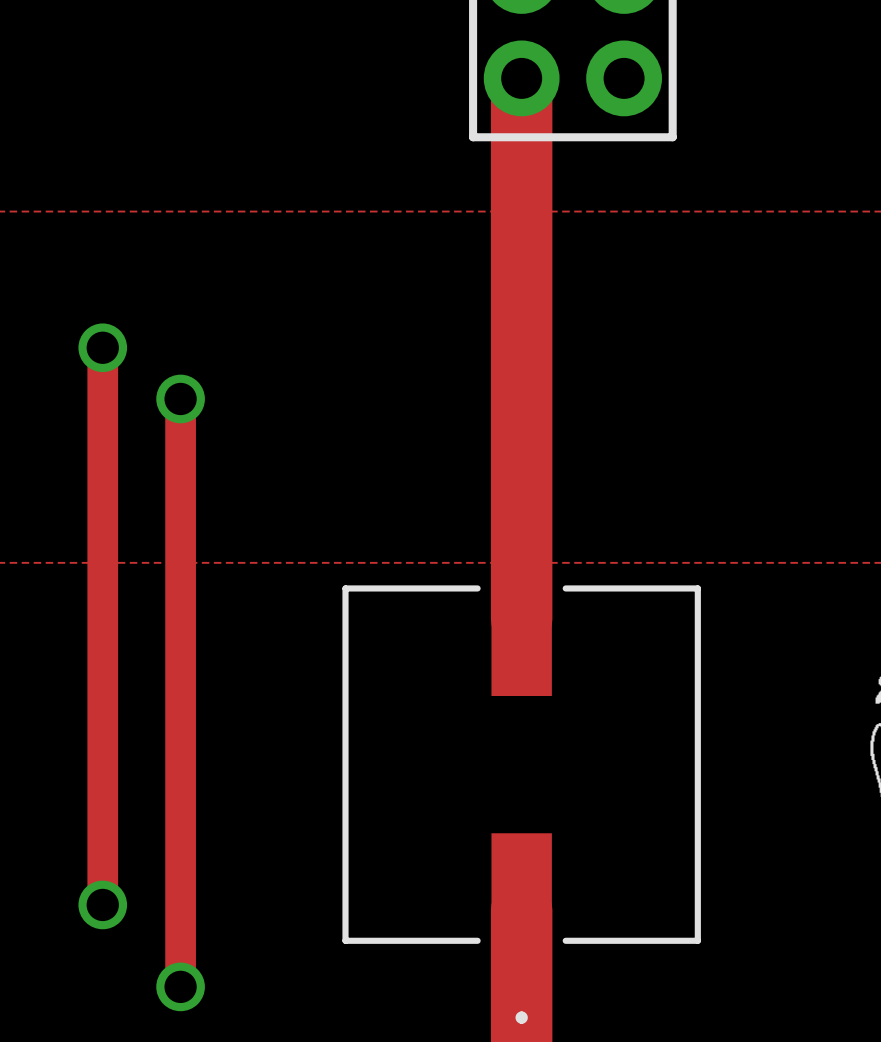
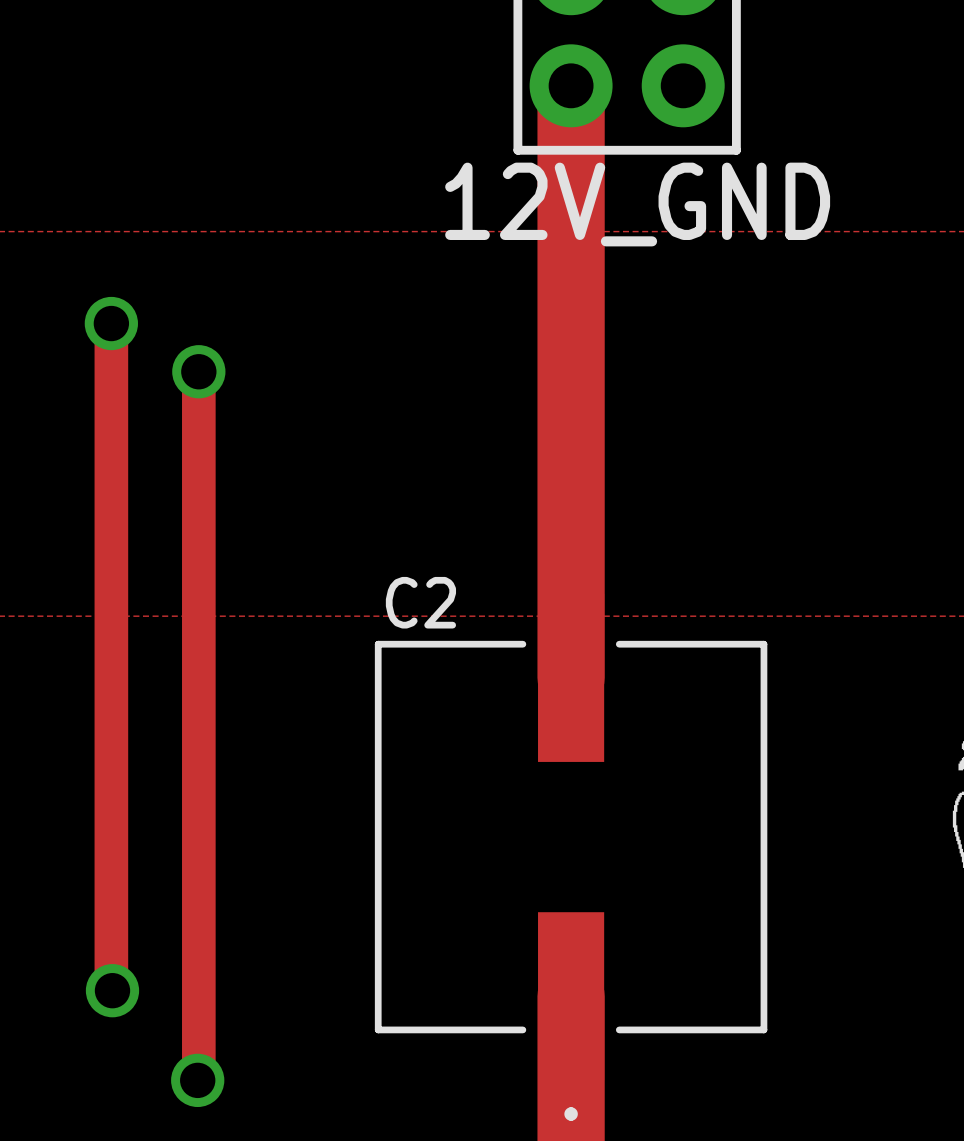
text: none -> 12V_GND (637, 204)
via: none -> (111, 323)
via: none -> (198, 371)
track: (102, 347) (102, 904) -> (111, 323) (112, 990)
via: (102, 347) -> none
track: (180, 398) (180, 986) -> (198, 371) (197, 1080)
via: (180, 398) -> none
part text: none -> C2 (420, 602)

